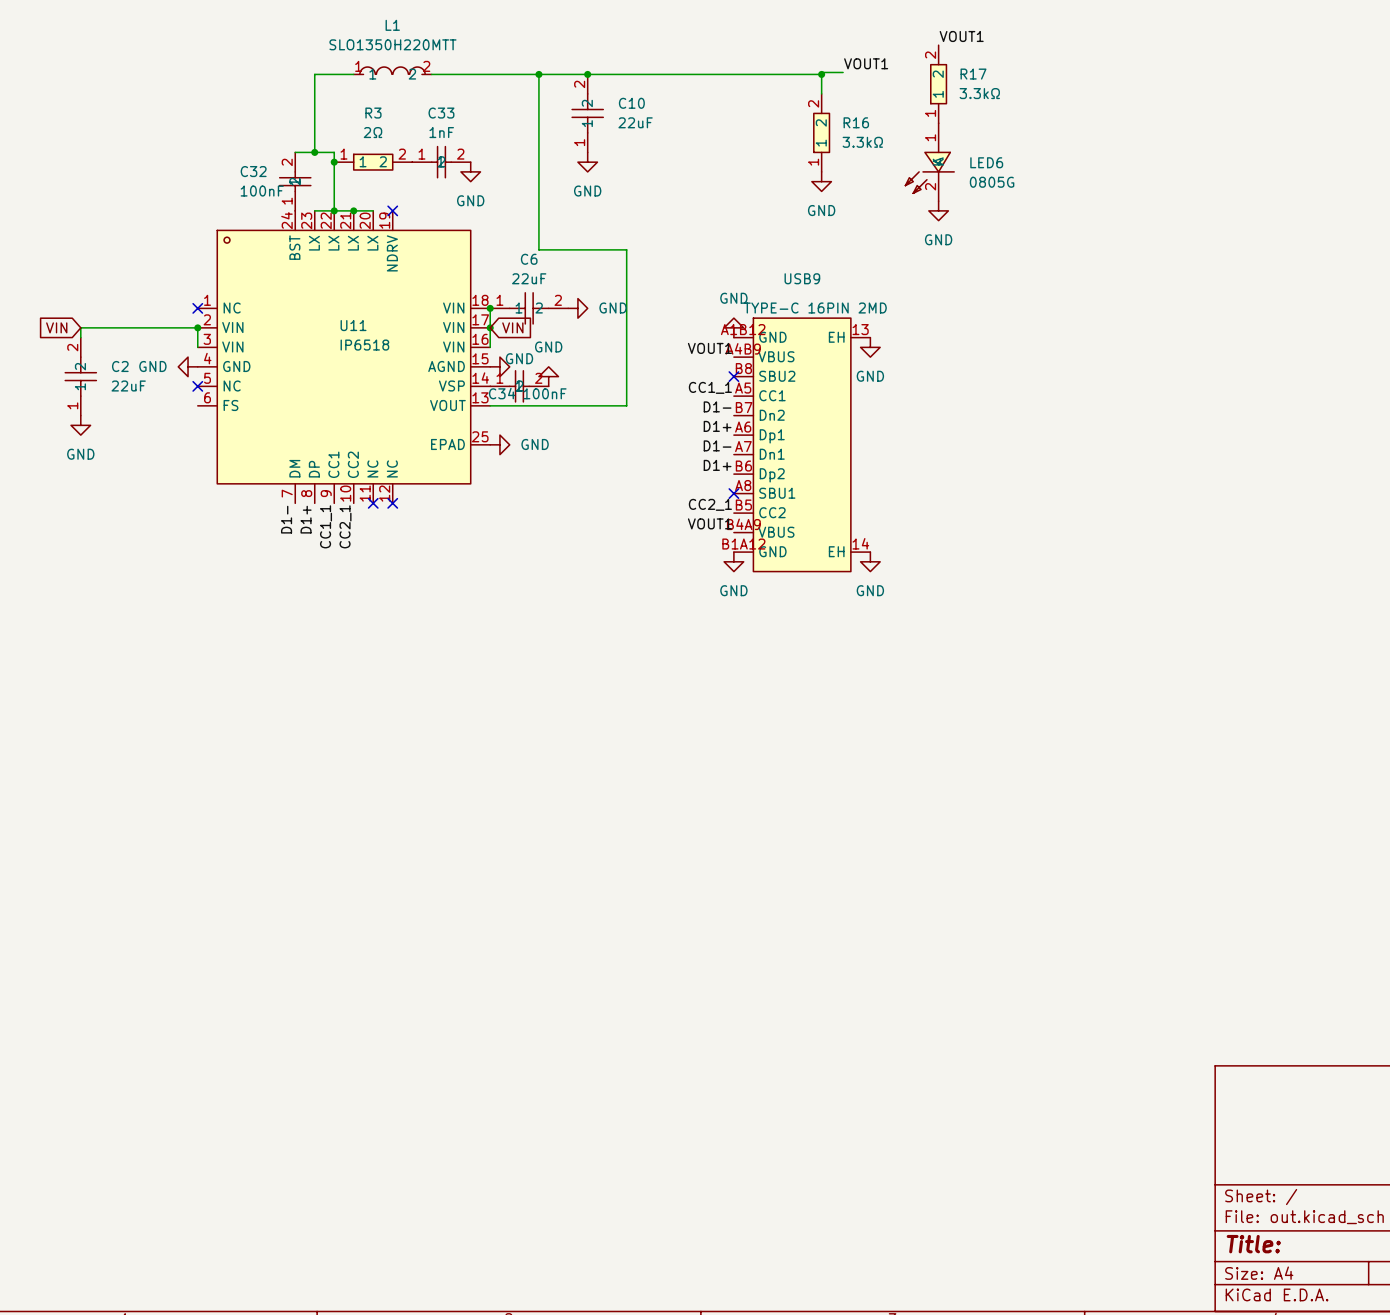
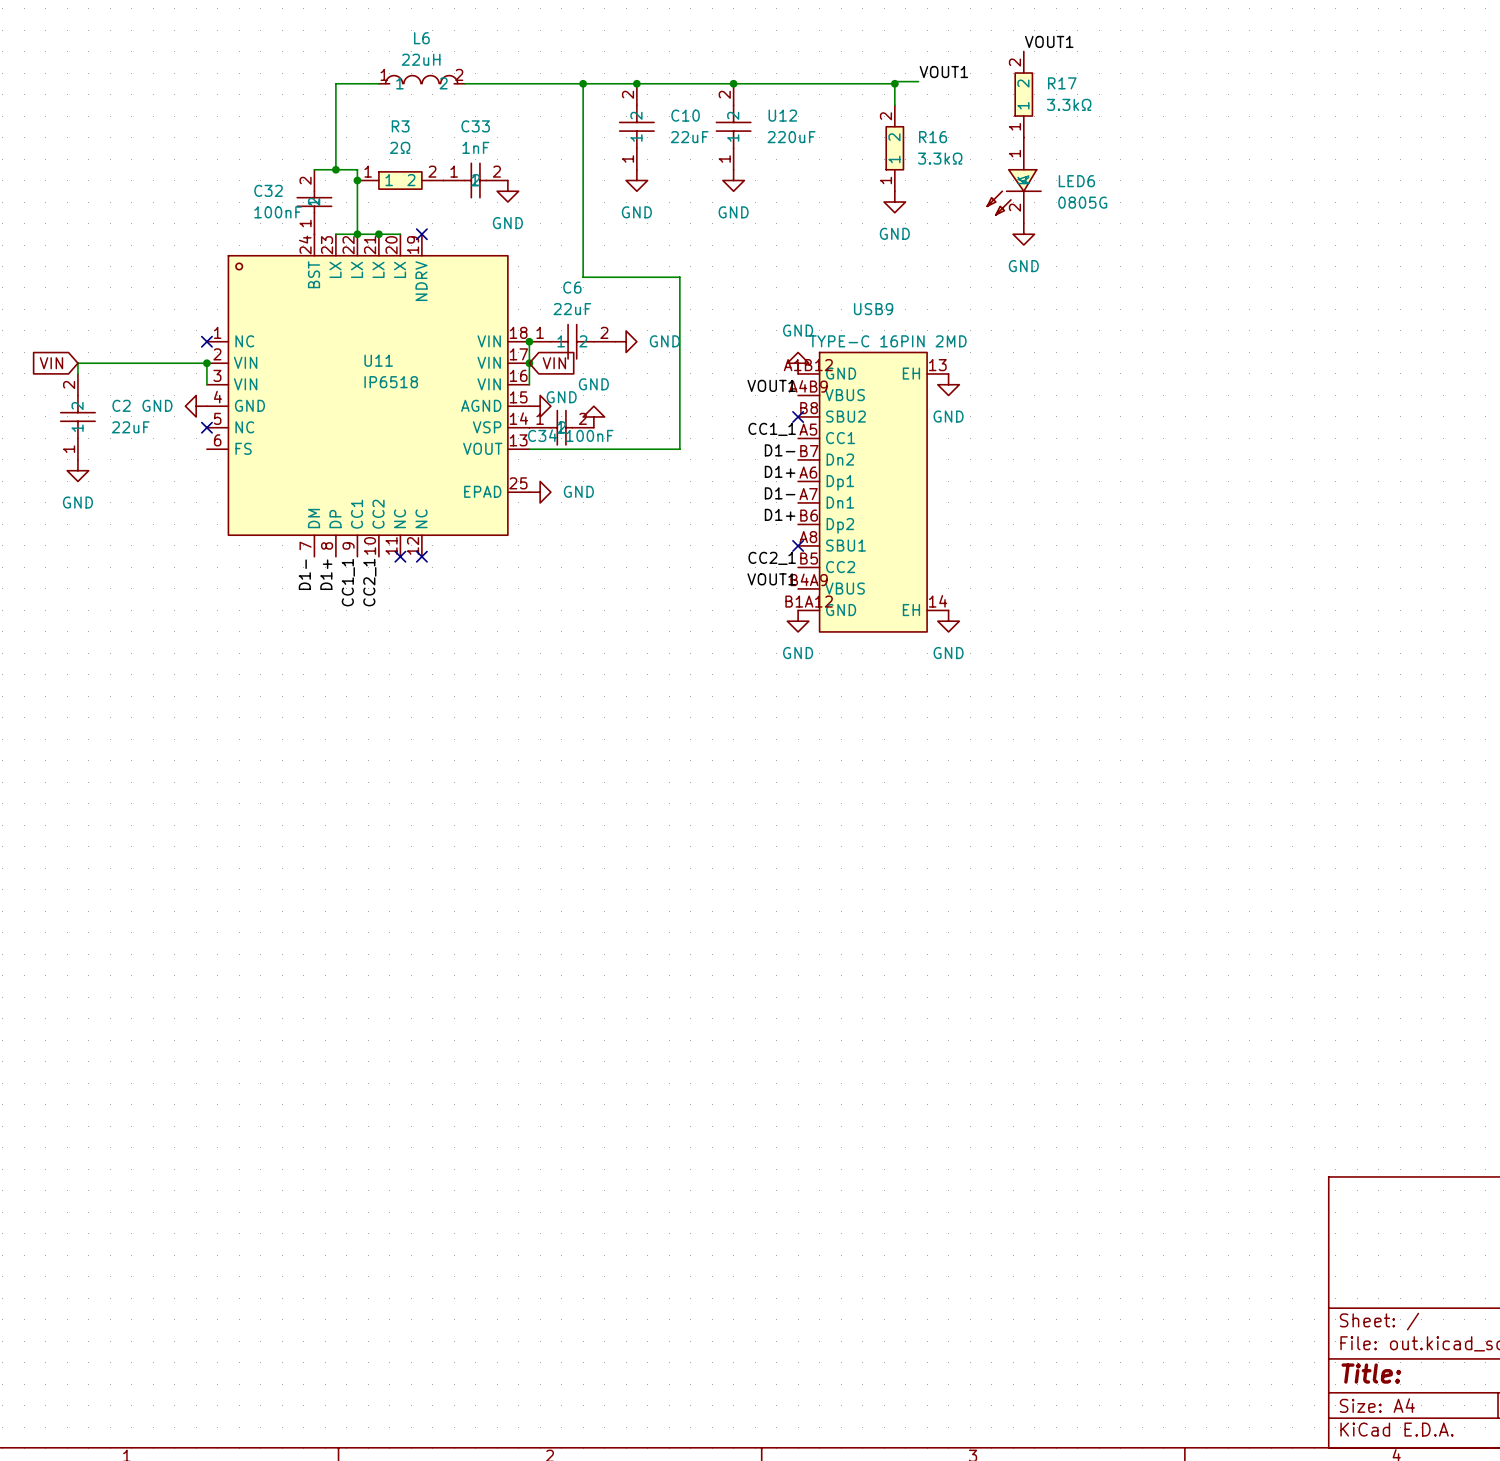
L1 name: L1 (392, 25) -> L6 (421, 38)
L1 value: SLO1350H220MTT (392, 44) -> 22uH (421, 59)
junction: none -> (733, 83)
U12: none -> 220uF (733, 126)
power symbol: none -> GND (733, 180)

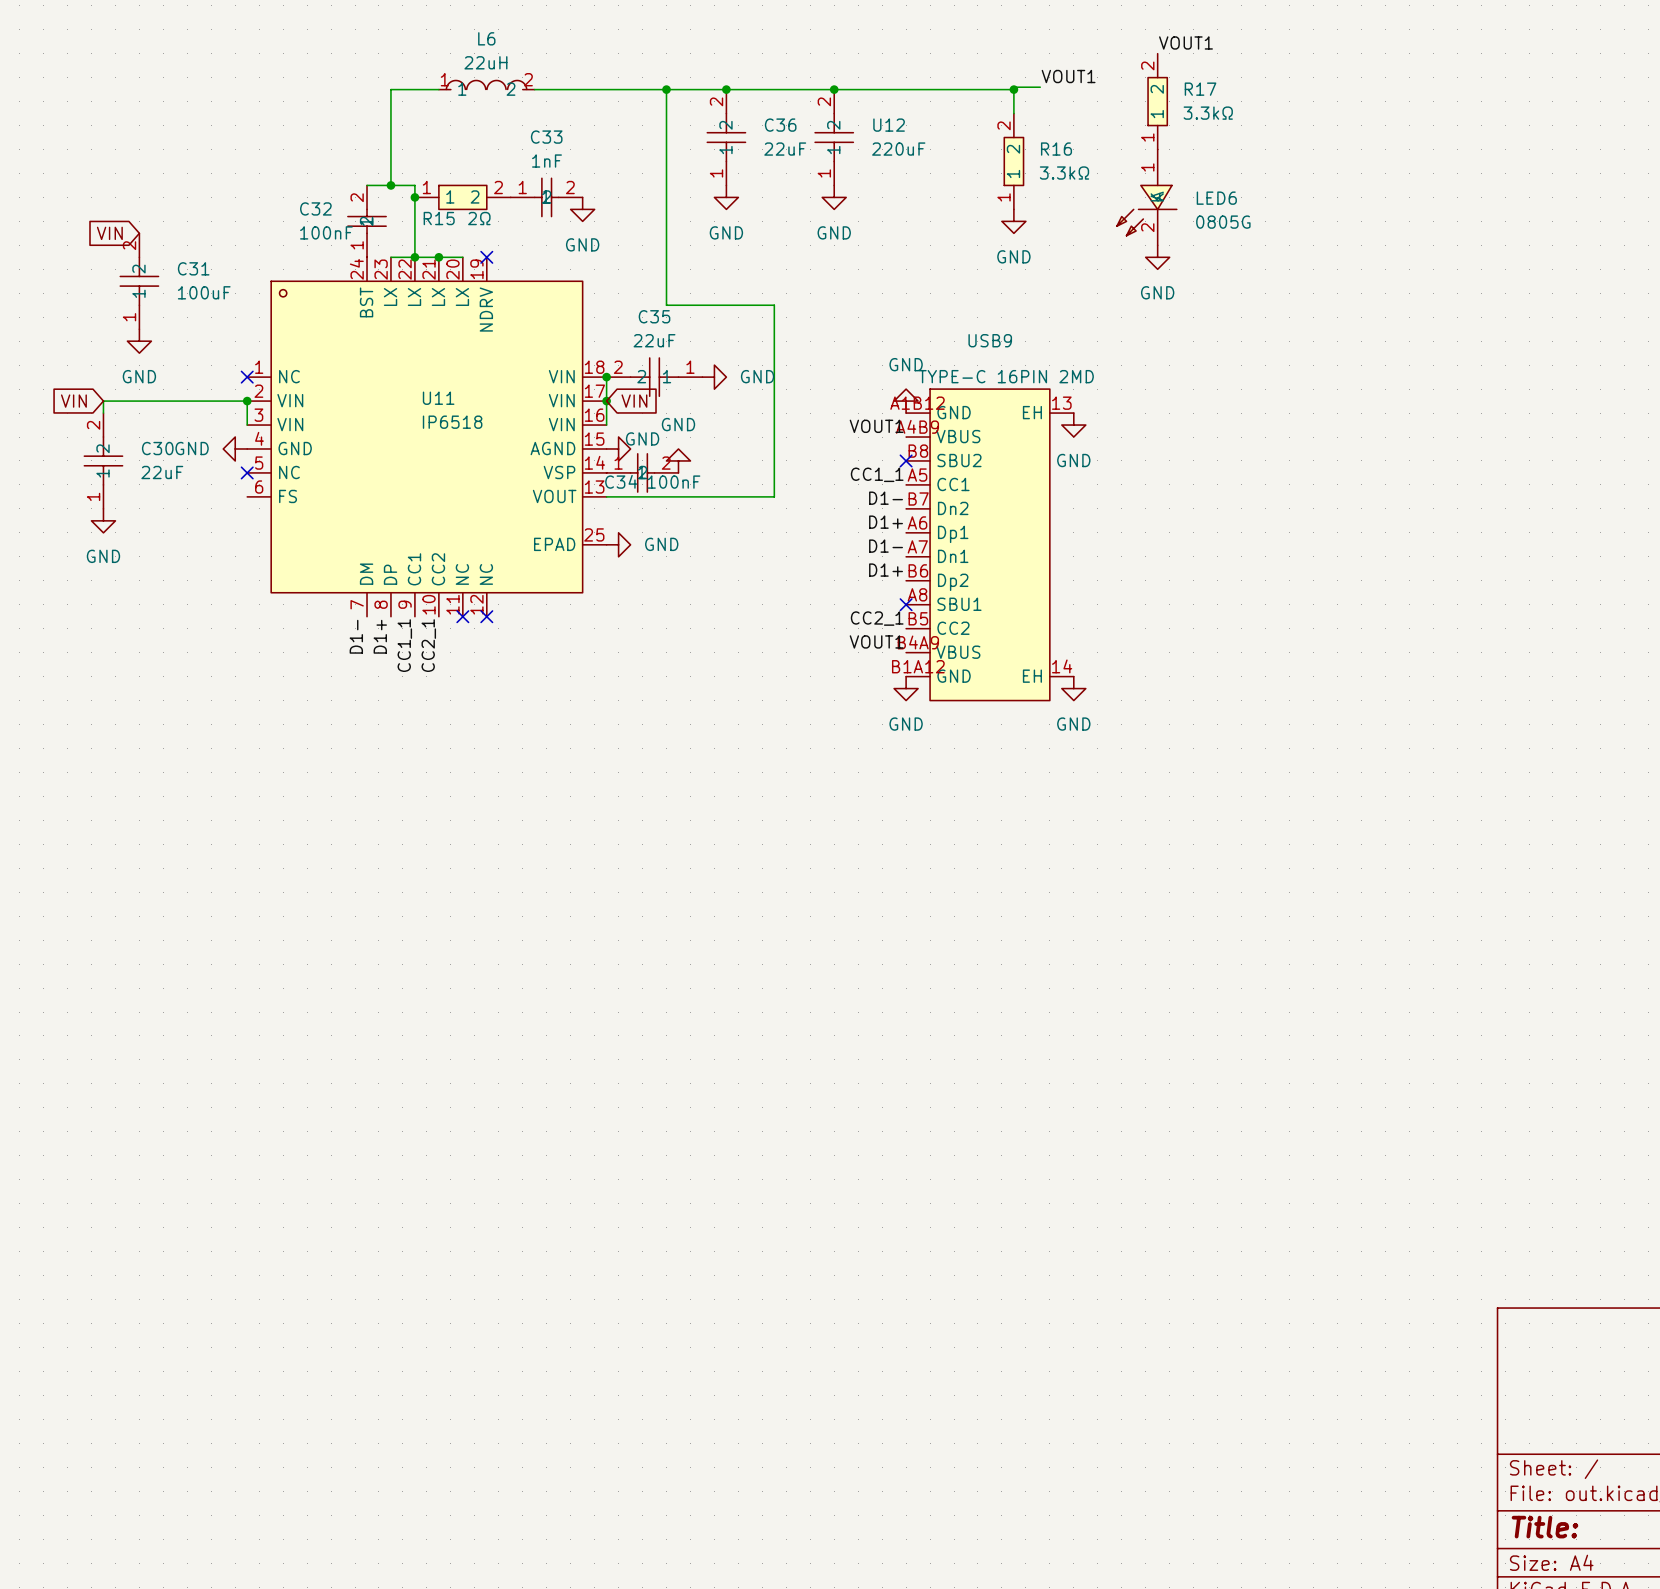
C10 name: C10 (685, 115) -> C36 (780, 125)
R3: 2Ω (400, 180) -> none
R15: none -> 2Ω (462, 197)
global label: none -> VIN (109, 233)
C31: none -> 100uF (139, 281)
C6 name: C6 (572, 287) -> C35 (654, 316)
power symbol: none -> GND (139, 341)
C6 rotation: 0° (572, 341) -> 180° (654, 377)
C2 name: C2 (121, 405) -> C30 (157, 448)

